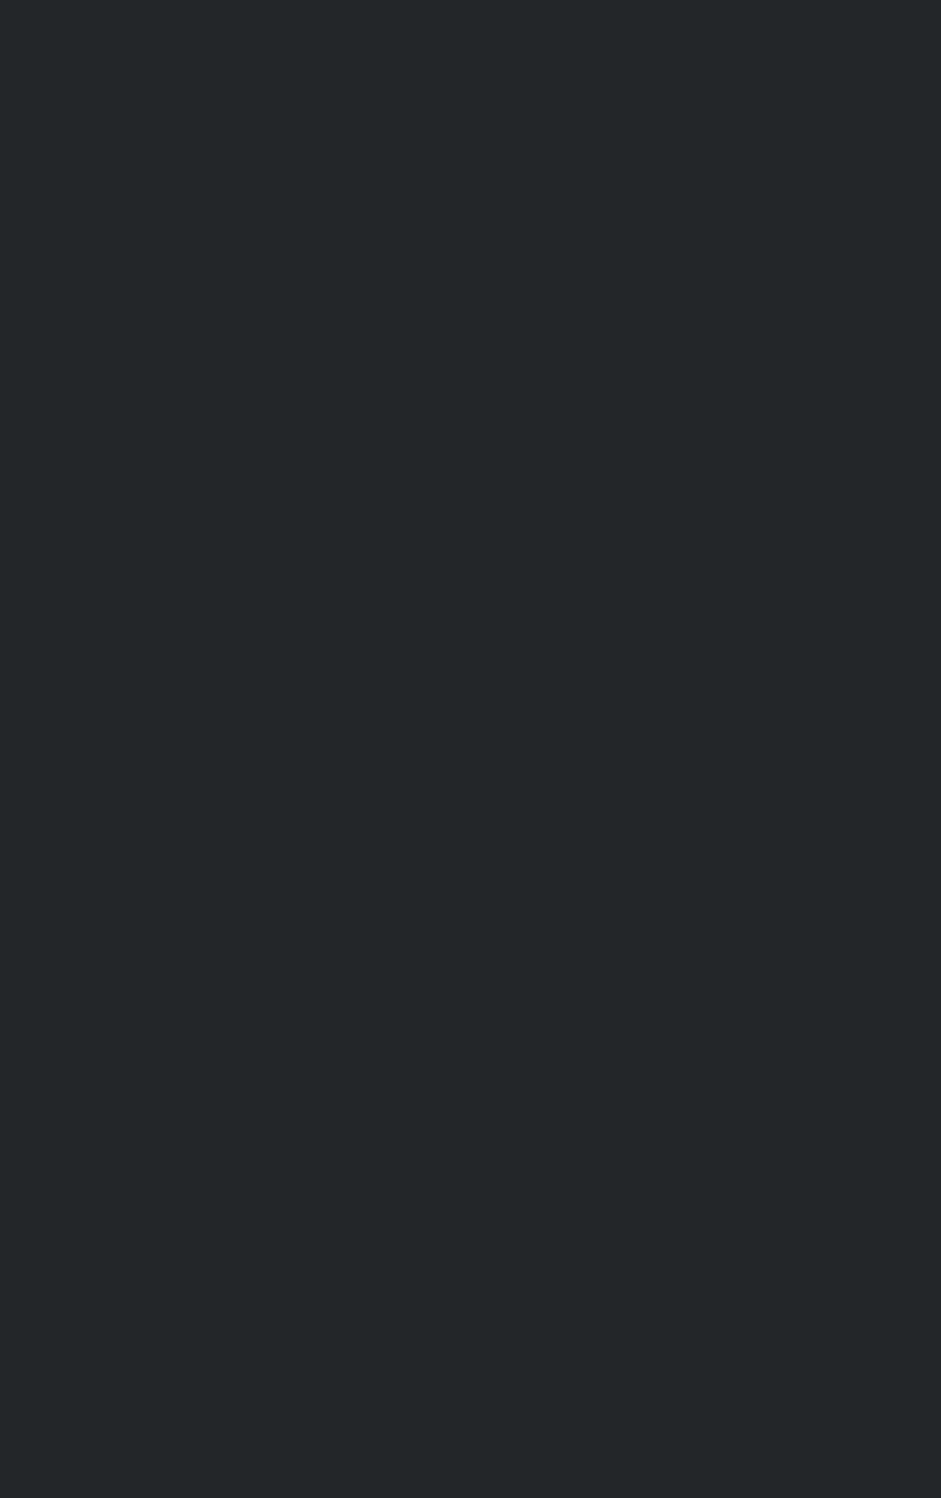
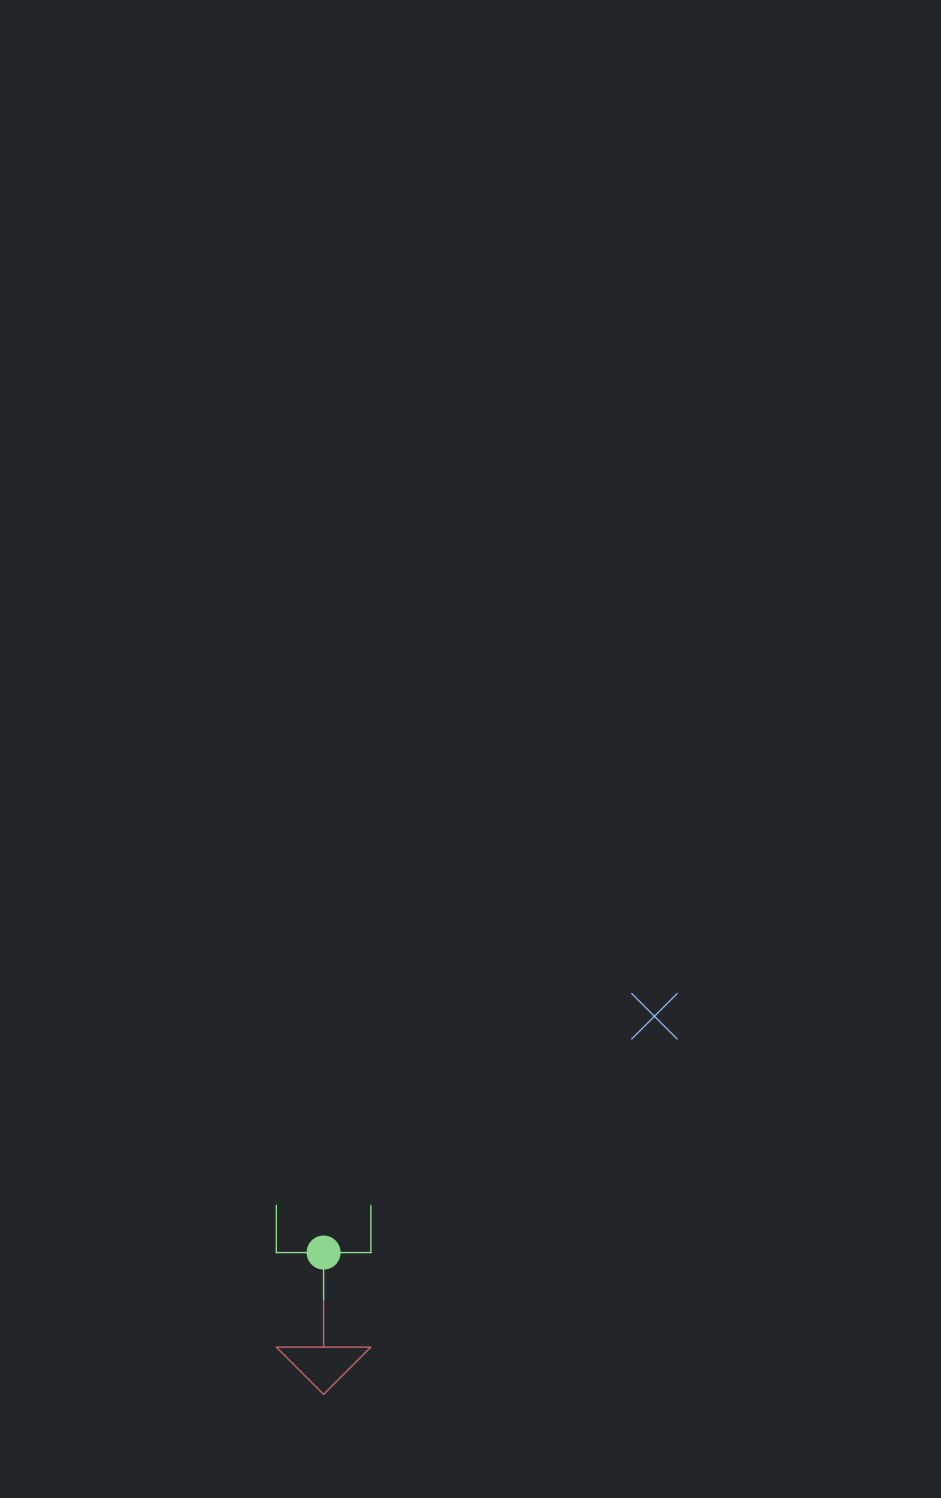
no-connect mark: none -> (654, 1016)
wire: none -> (276, 1205) (276, 1252) (370, 1252) (370, 1205)
wire: none -> (323, 1252) (323, 1299)
junction: none -> (323, 1252)
power symbol: none -> (323, 1347)

